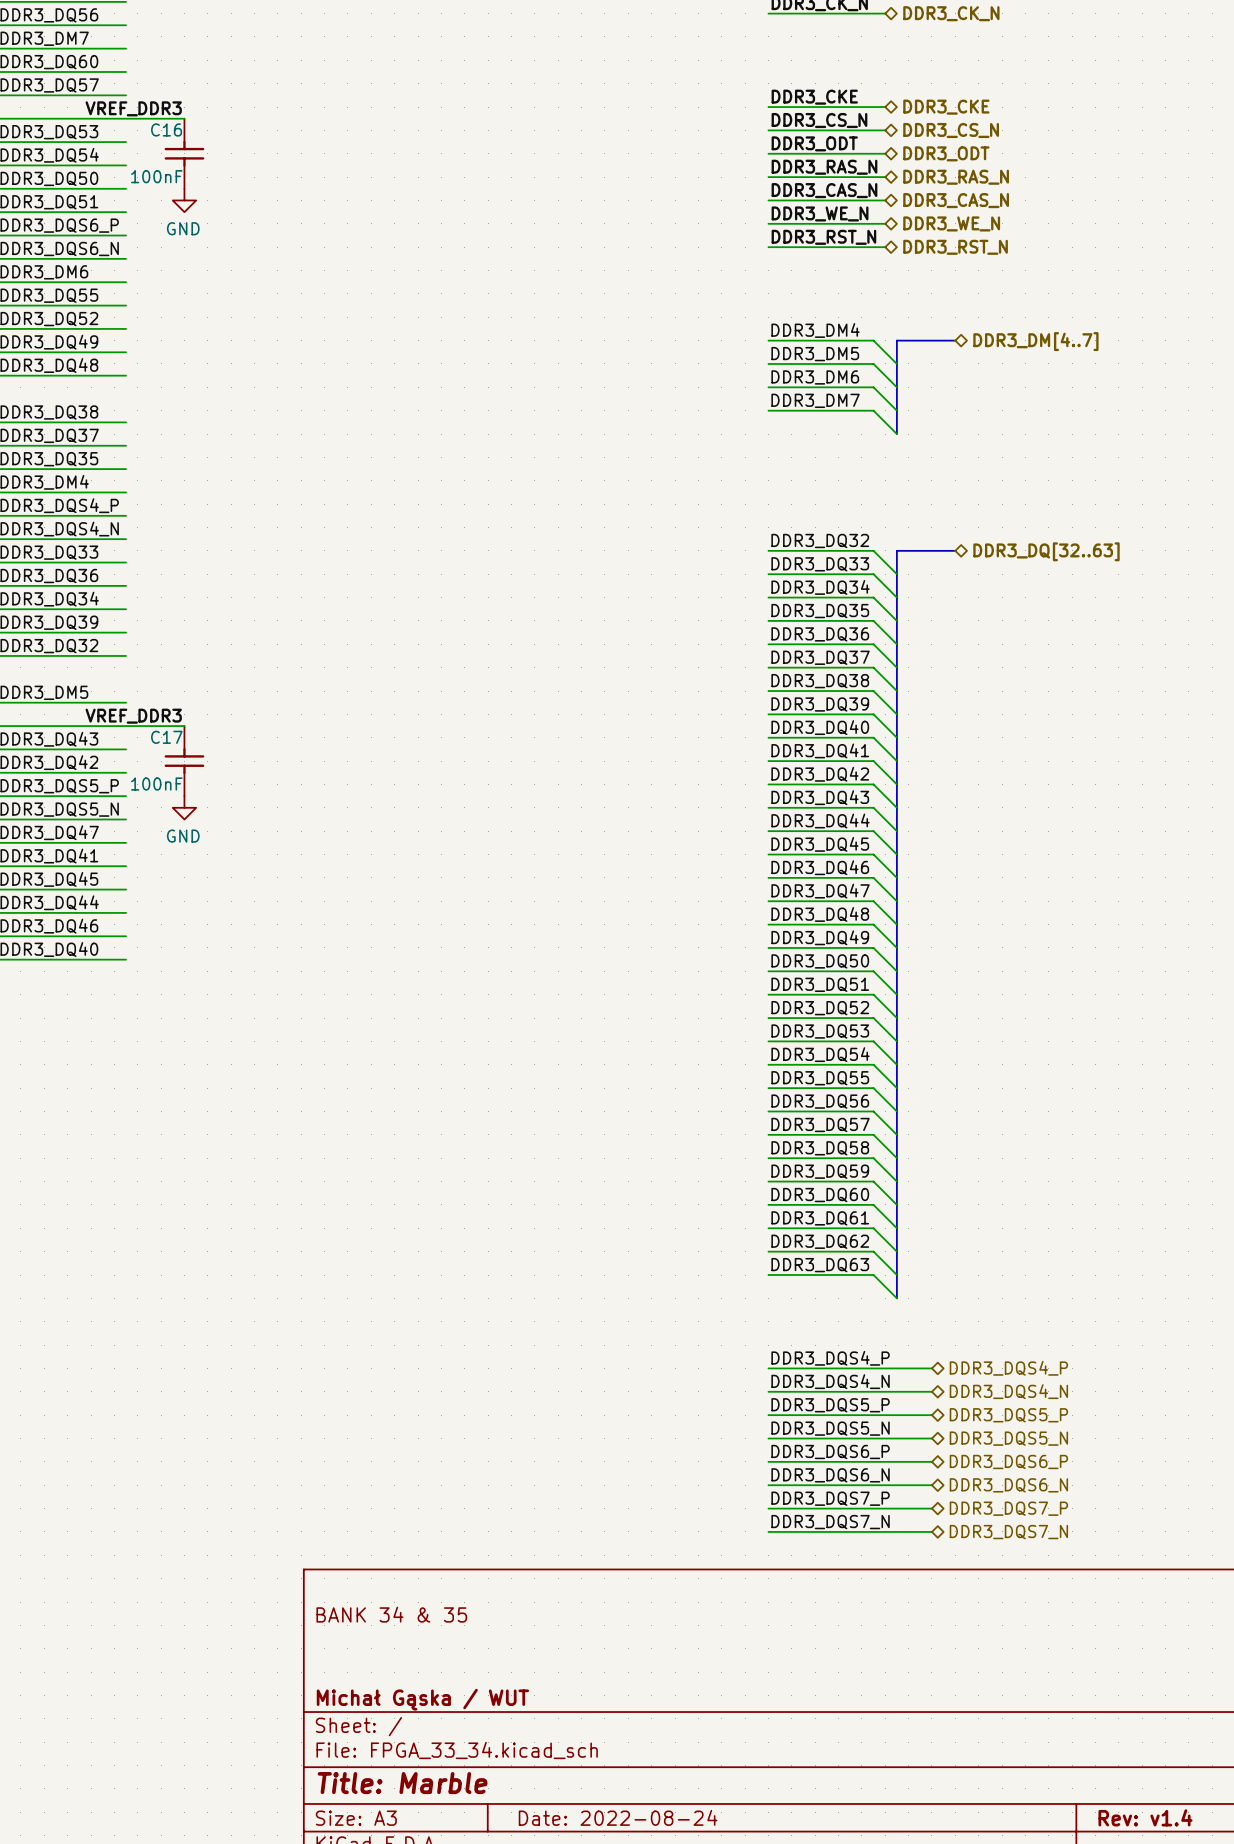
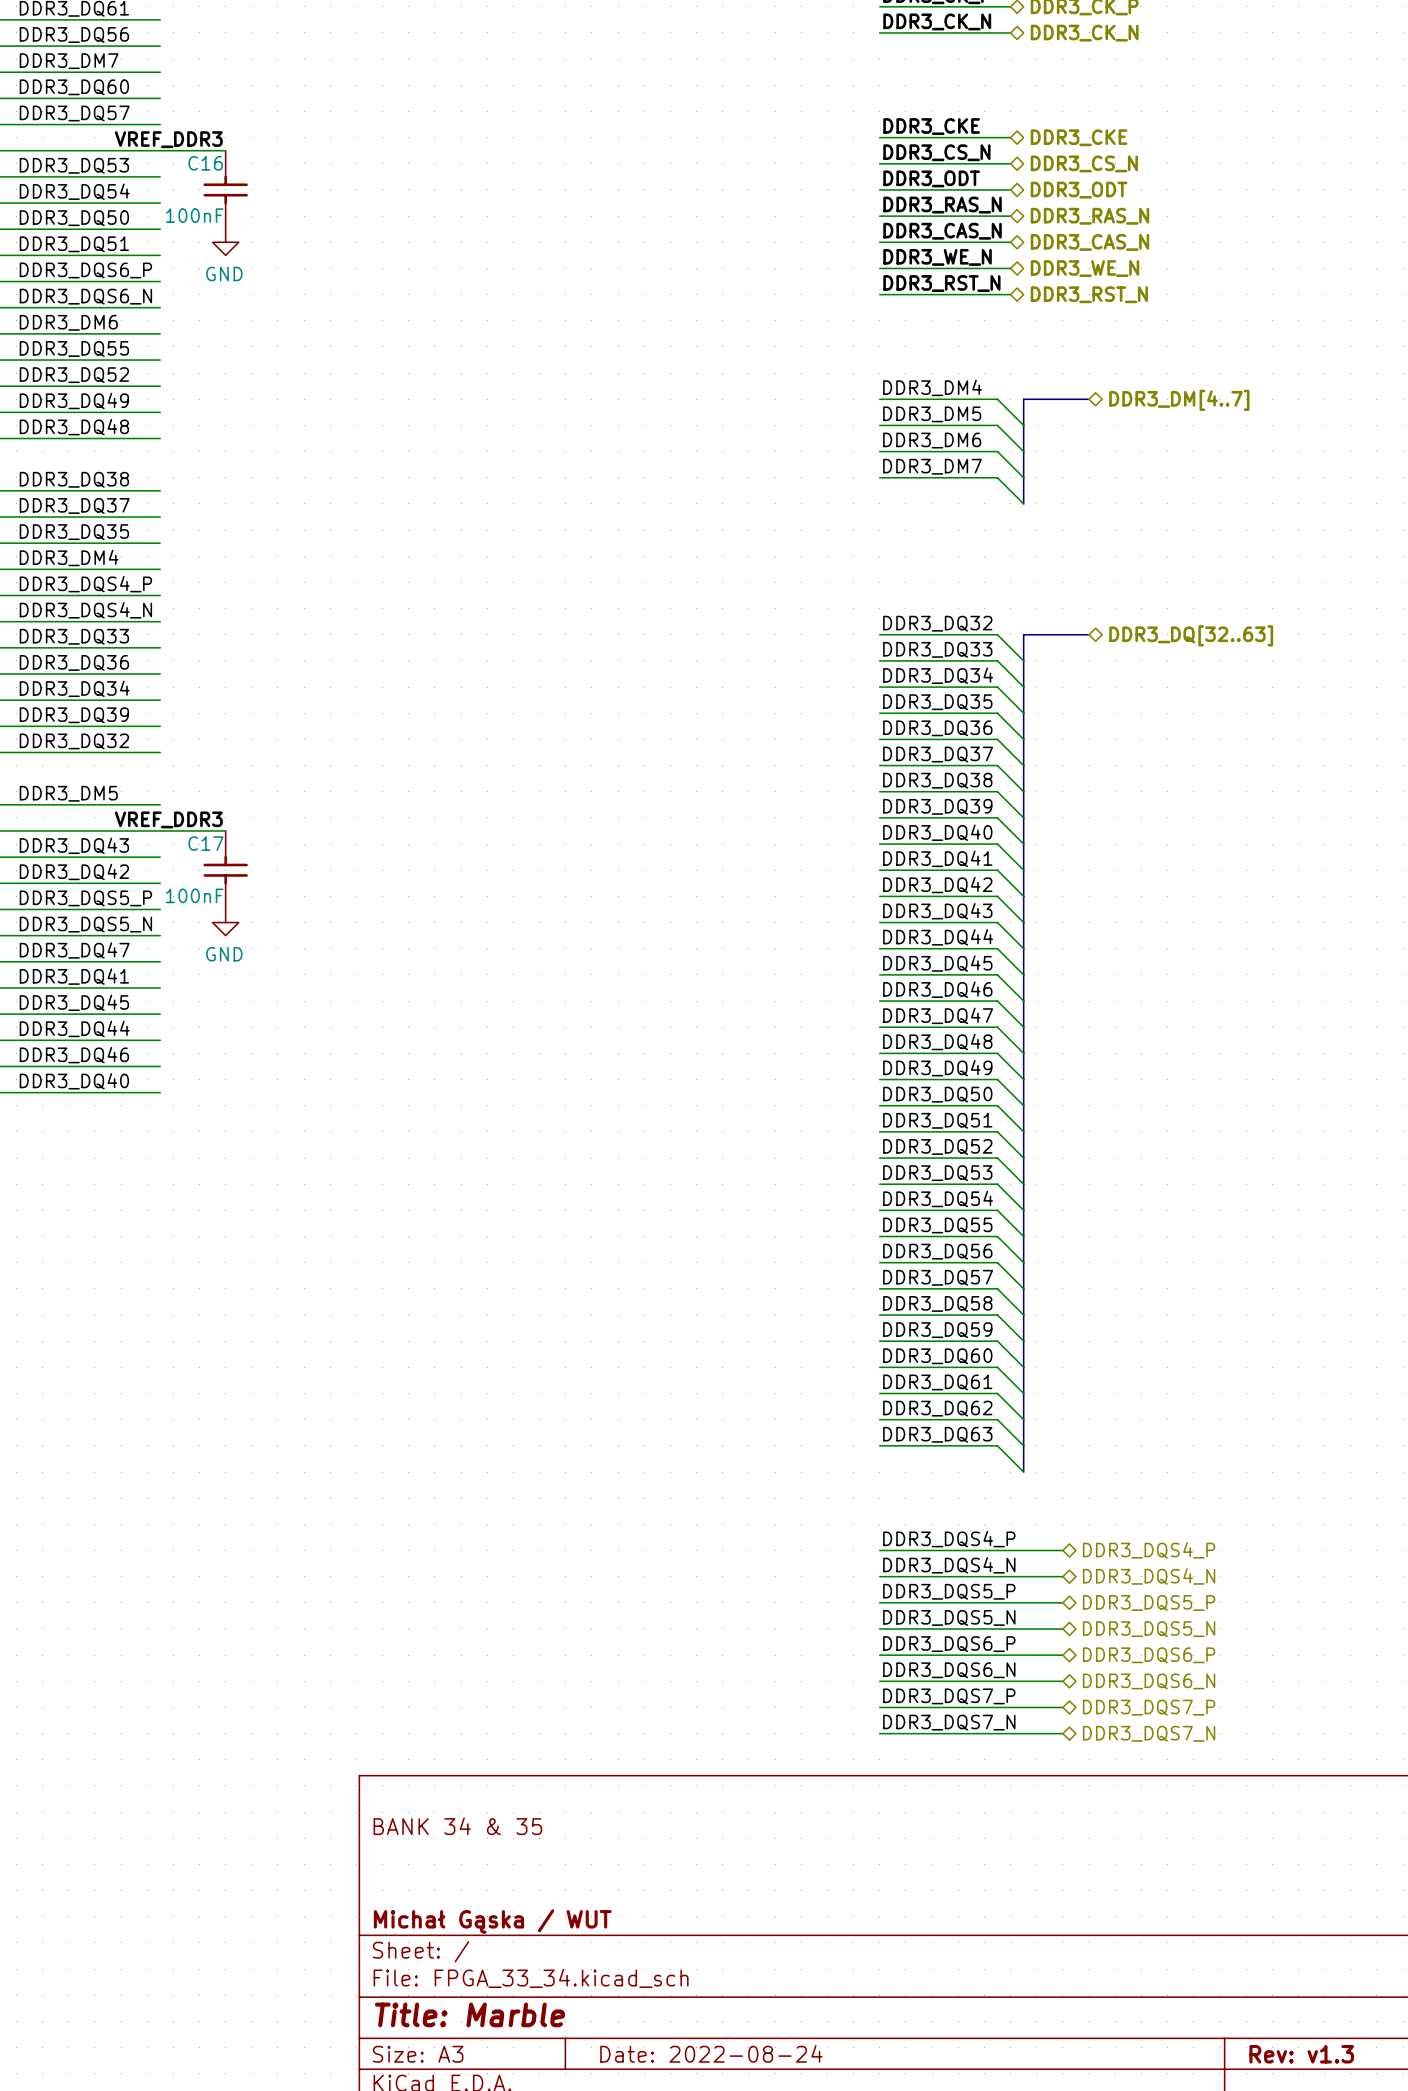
title block: Rev: v1.4 (1145, 1817) -> Rev: v1.3 (1301, 2054)

